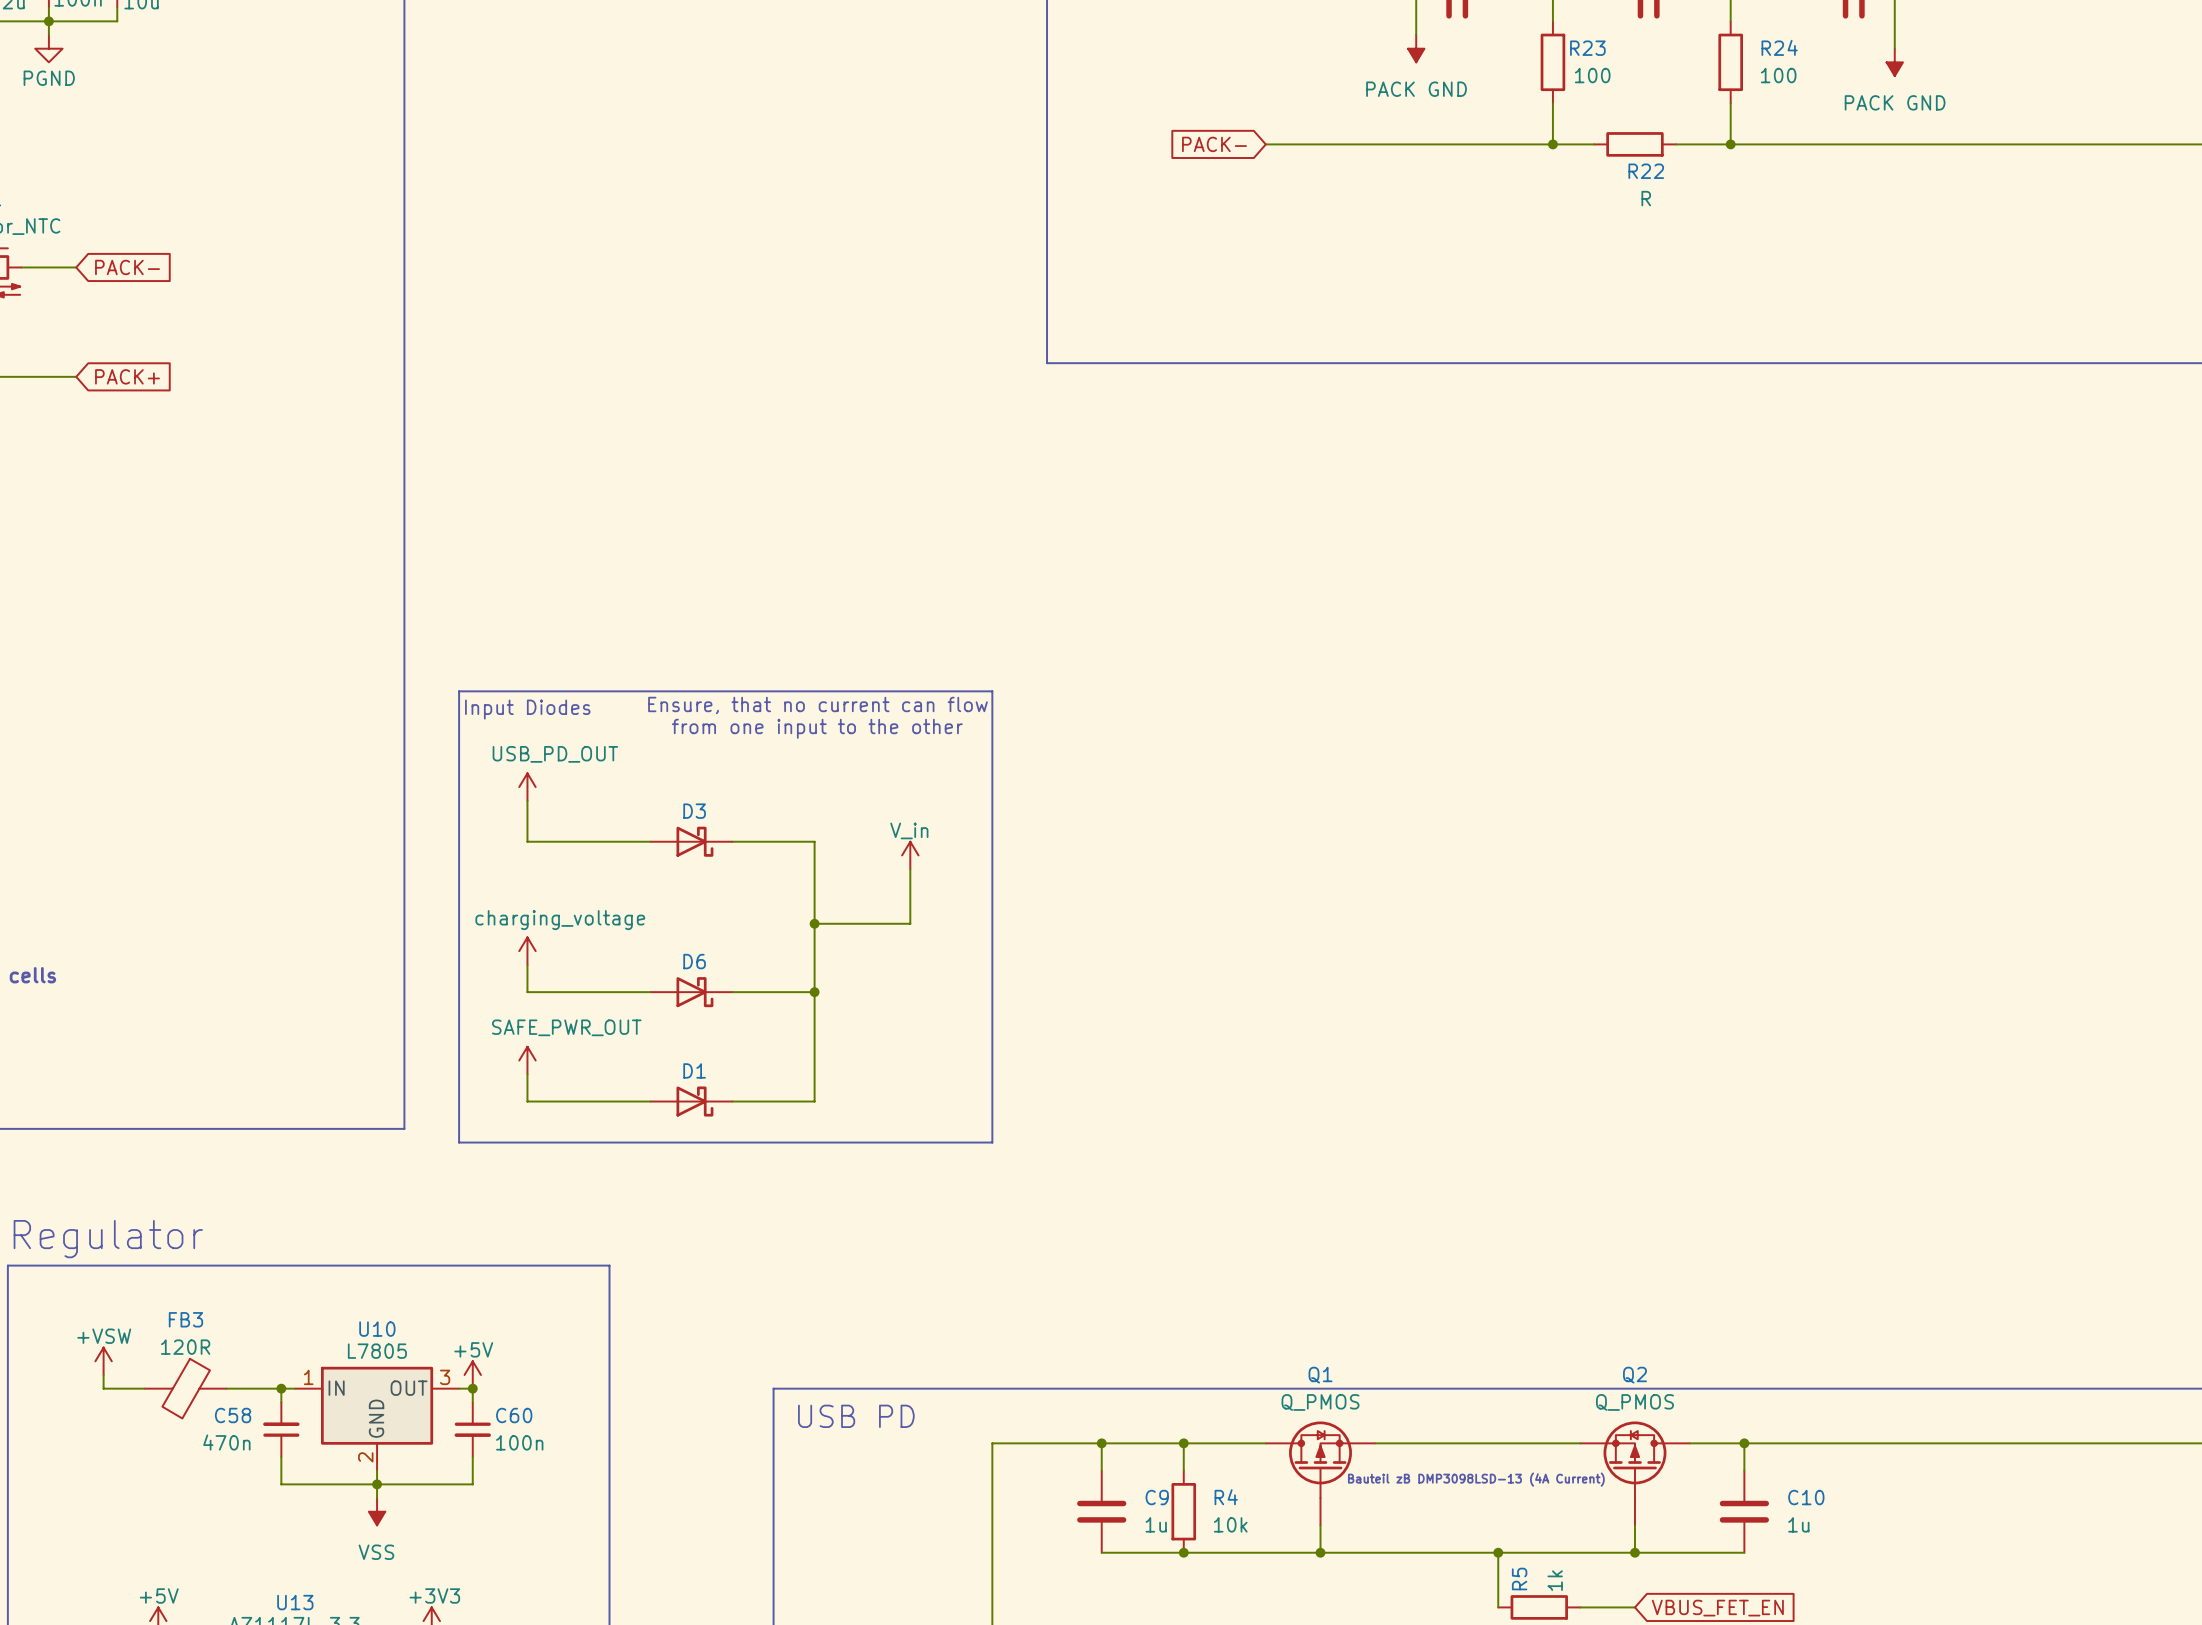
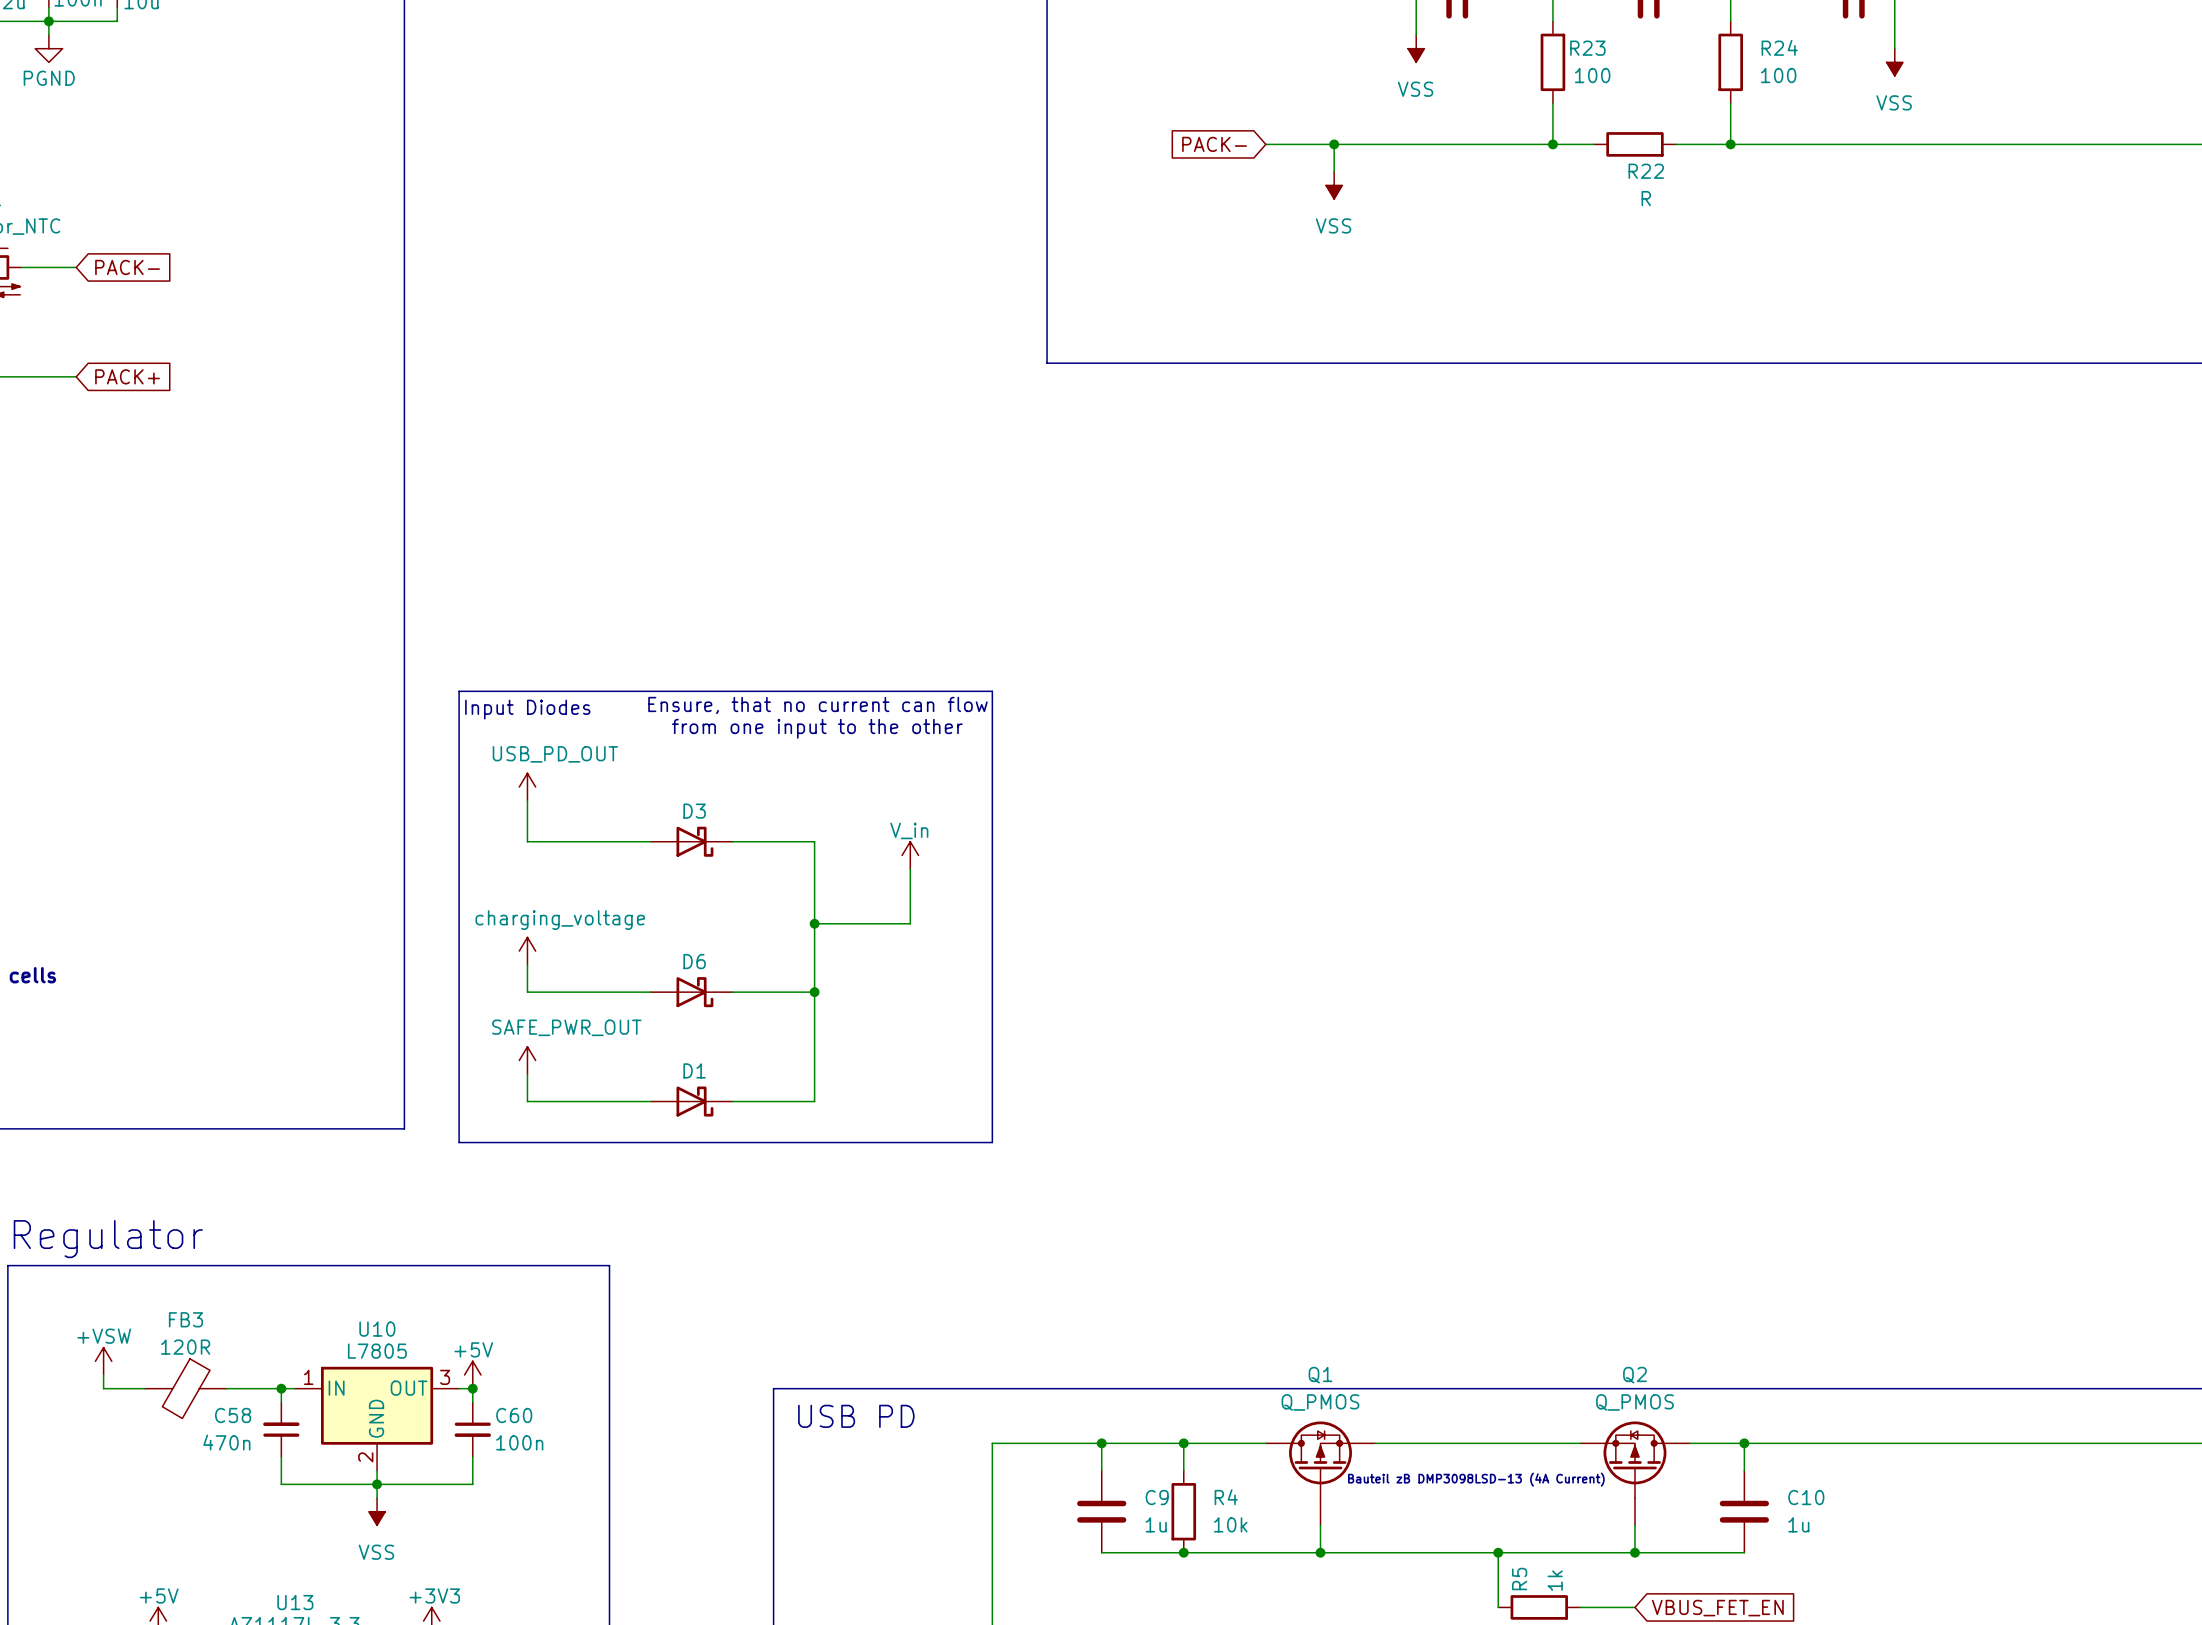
power symbol: PACK GND (1416, 48) -> VSS (1416, 48)
power symbol: PACK GND (1894, 62) -> VSS (1894, 62)
wire: none -> (1334, 144) (1334, 171)
junction: none -> (1334, 144)
power symbol: none -> VSS (1334, 185)

